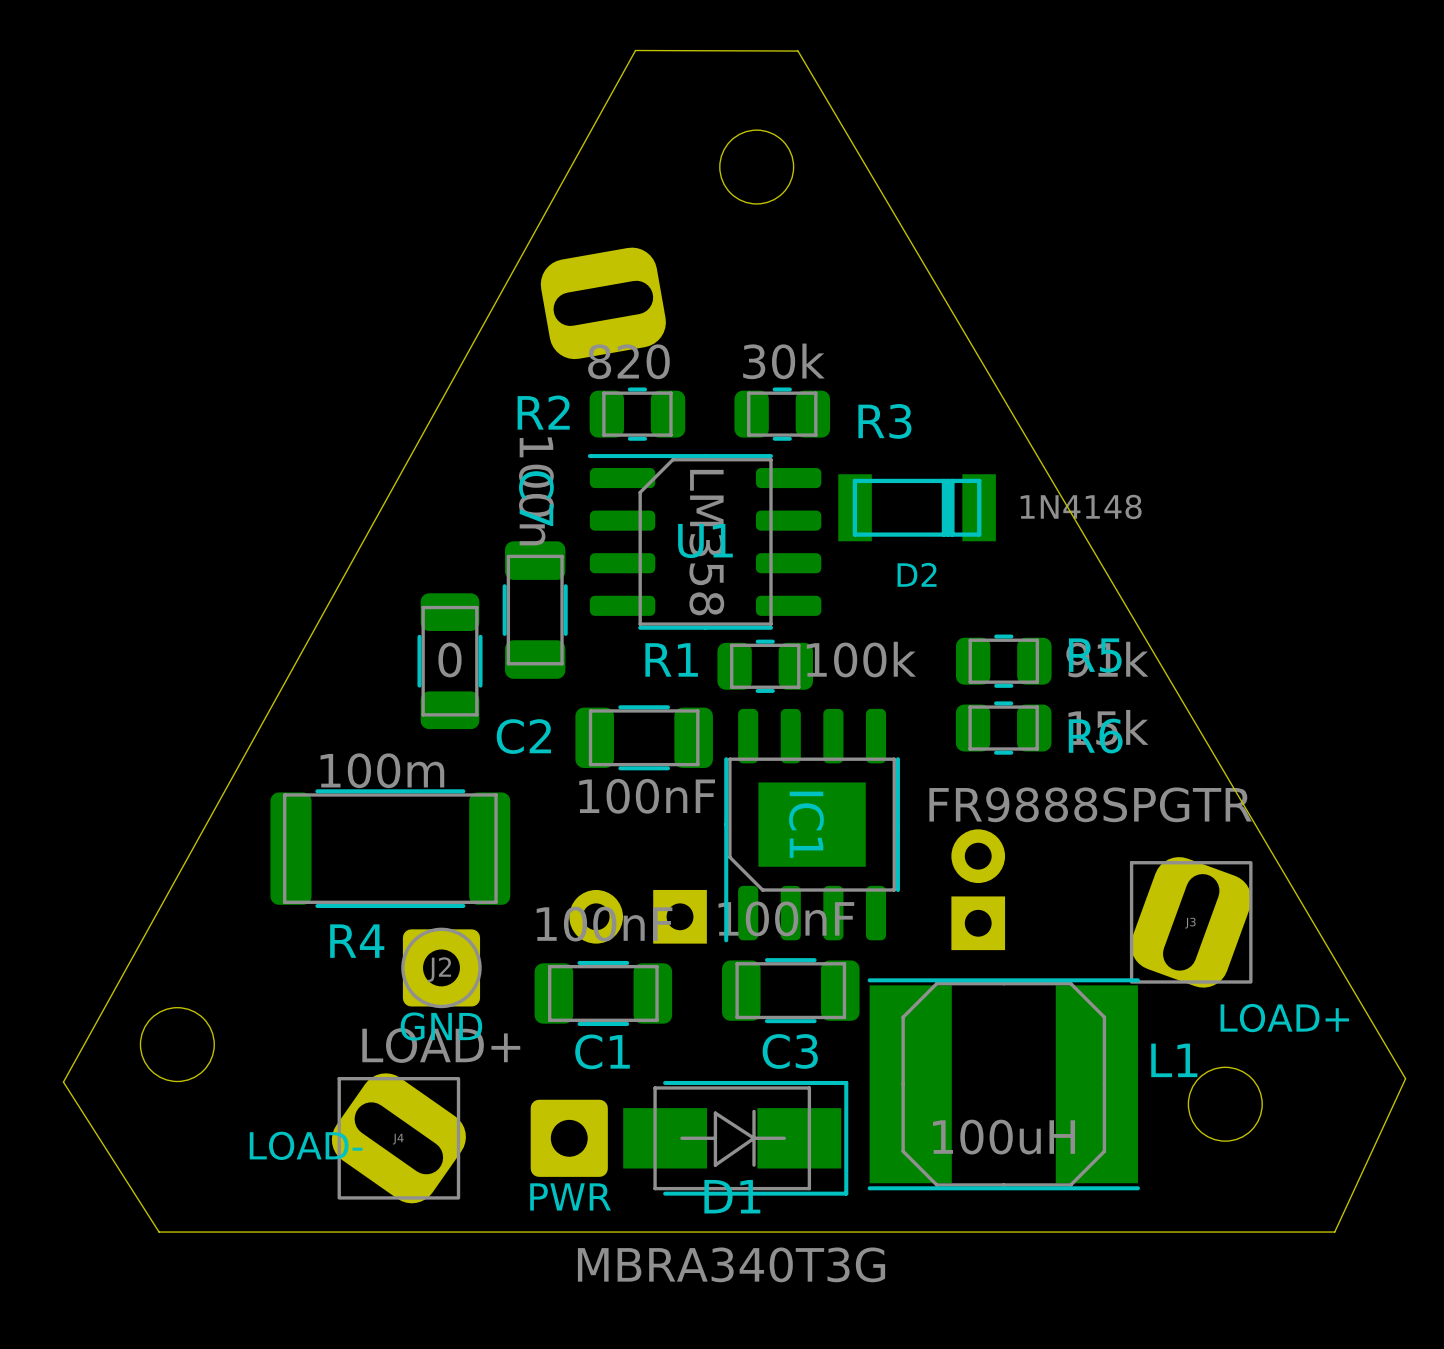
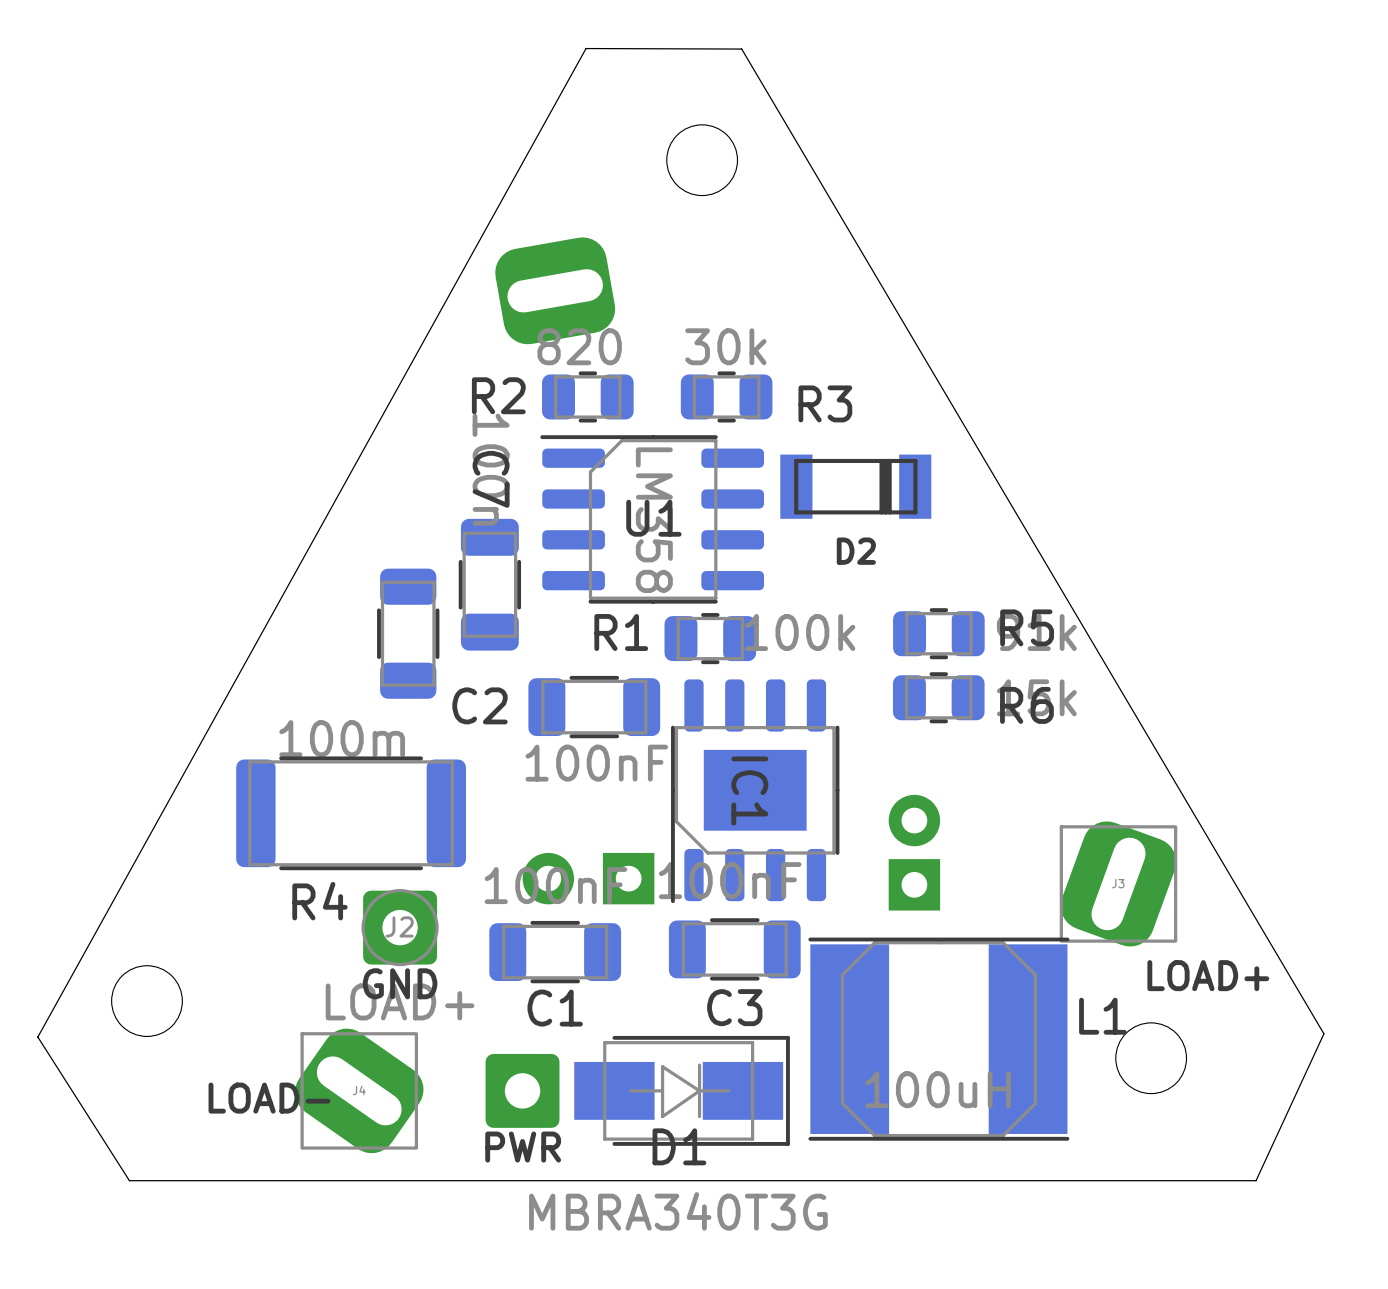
D2 value: 1N4148 (1081, 506) -> none
text: 0 (449, 659) -> none
IC1 value: FR9888SPGTR (1090, 804) -> none

